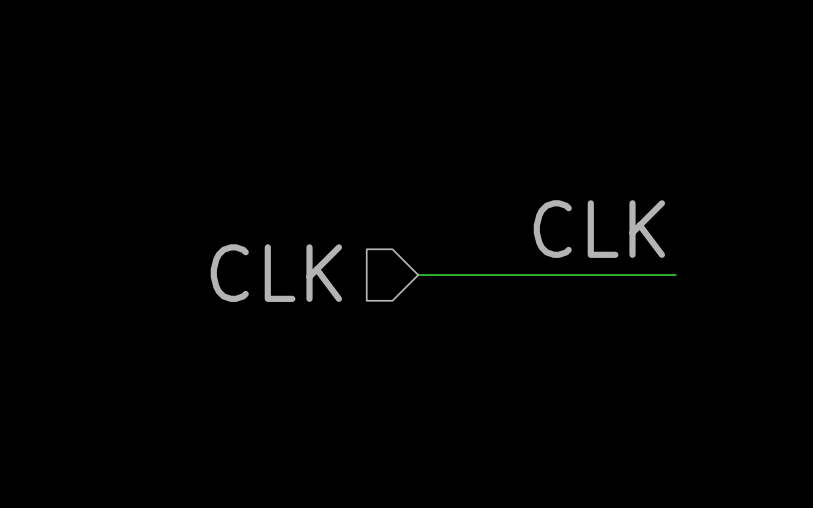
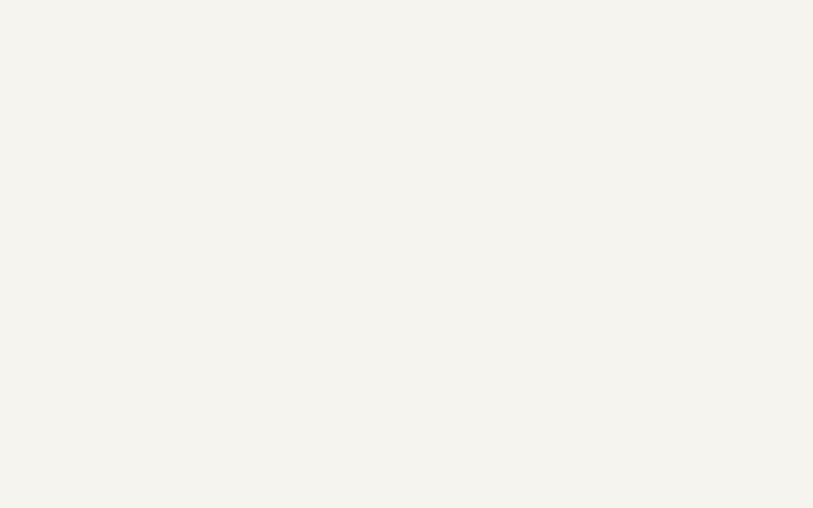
label: CLK (599, 229) -> none
hierarchical label: CLK (276, 273) -> none
wire: (418, 275) (675, 275) -> none

